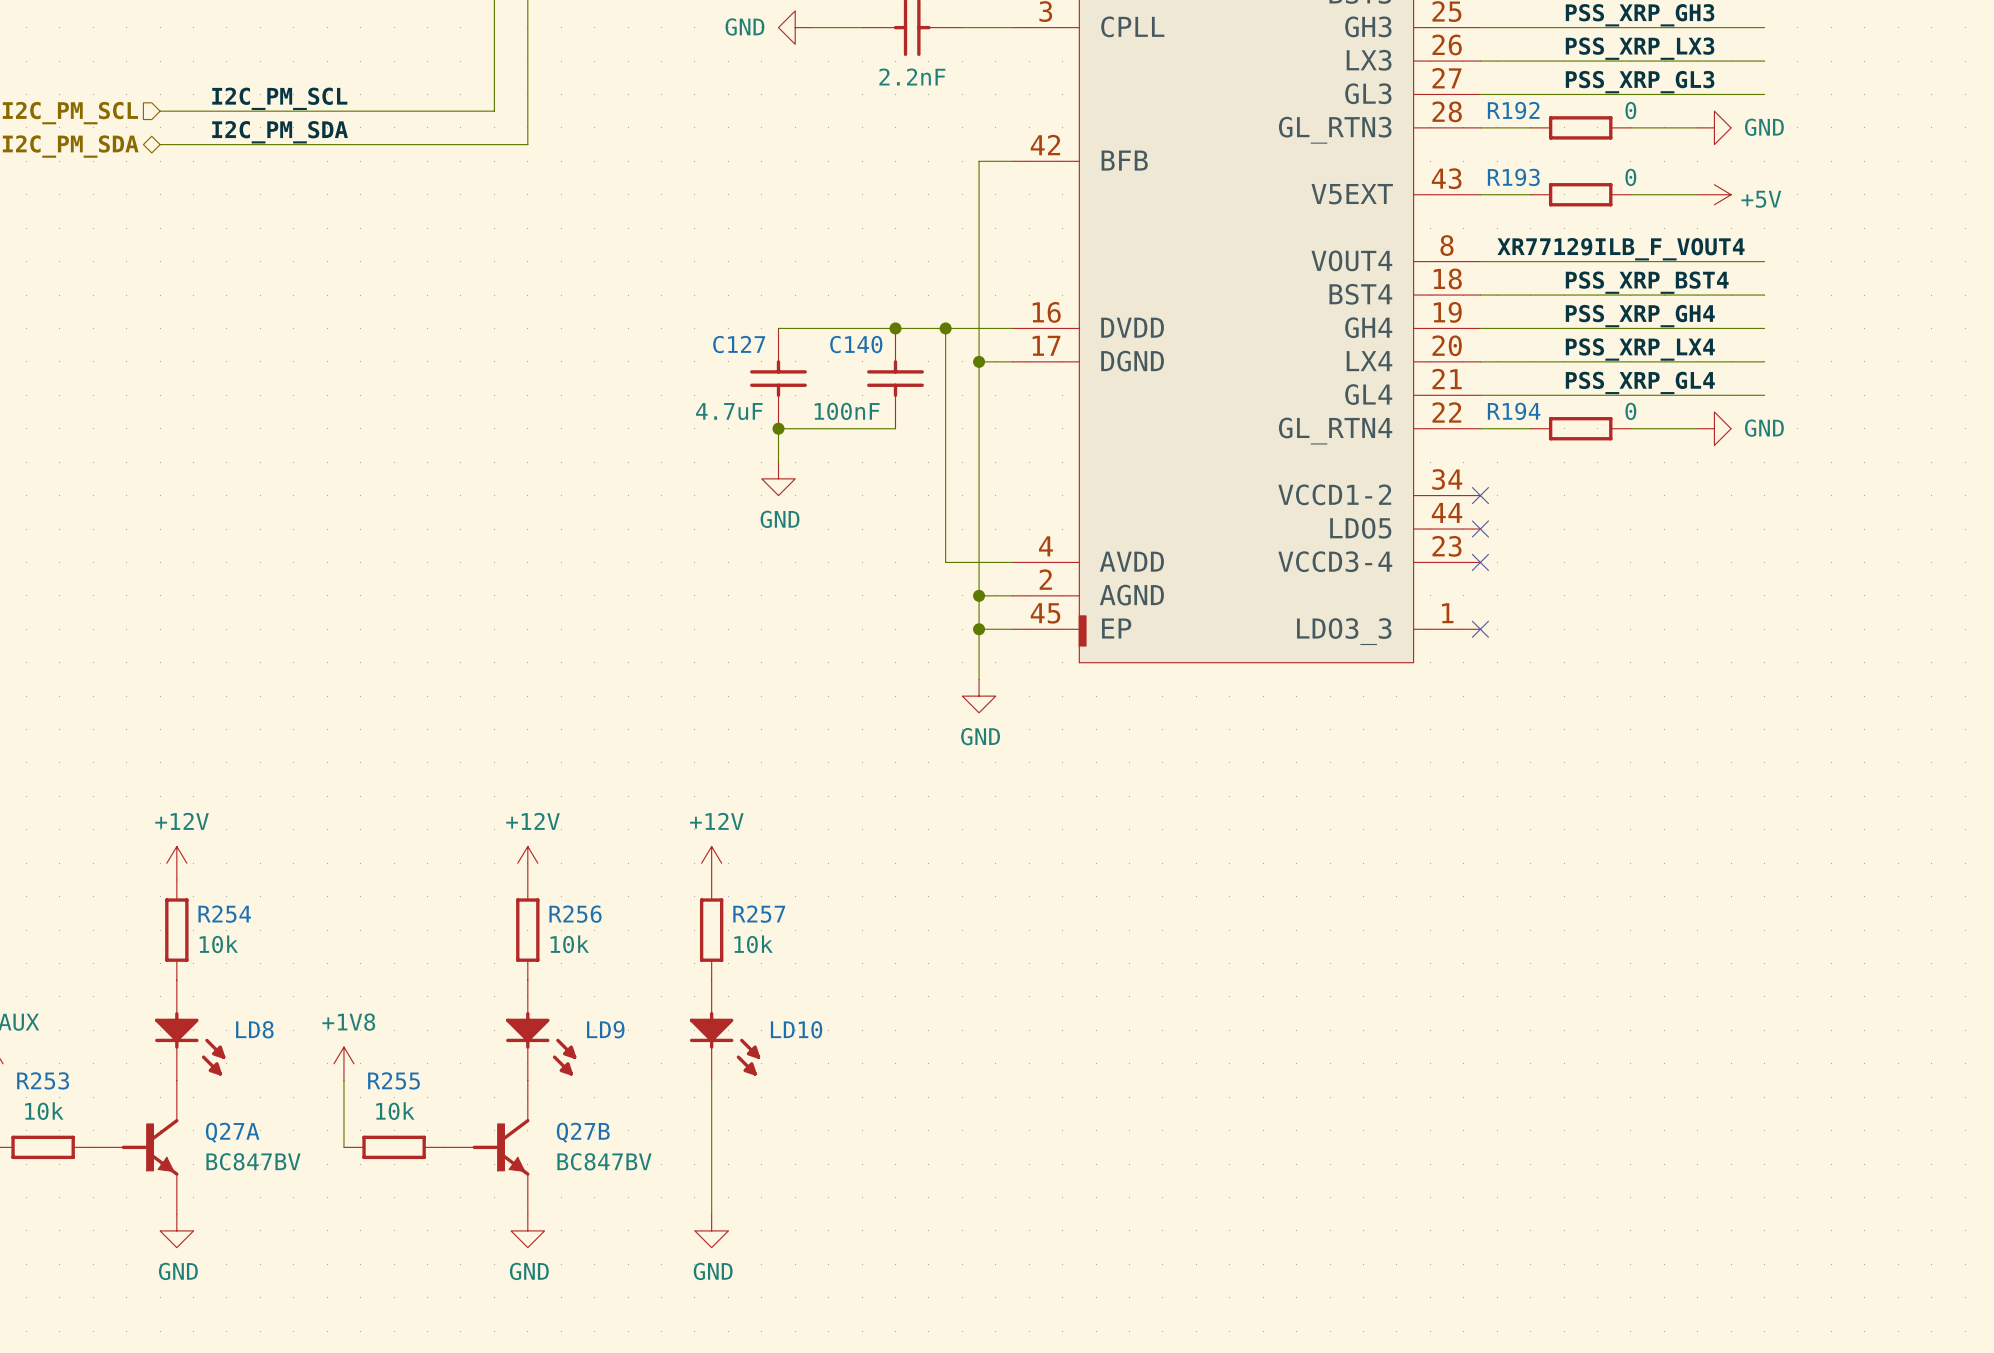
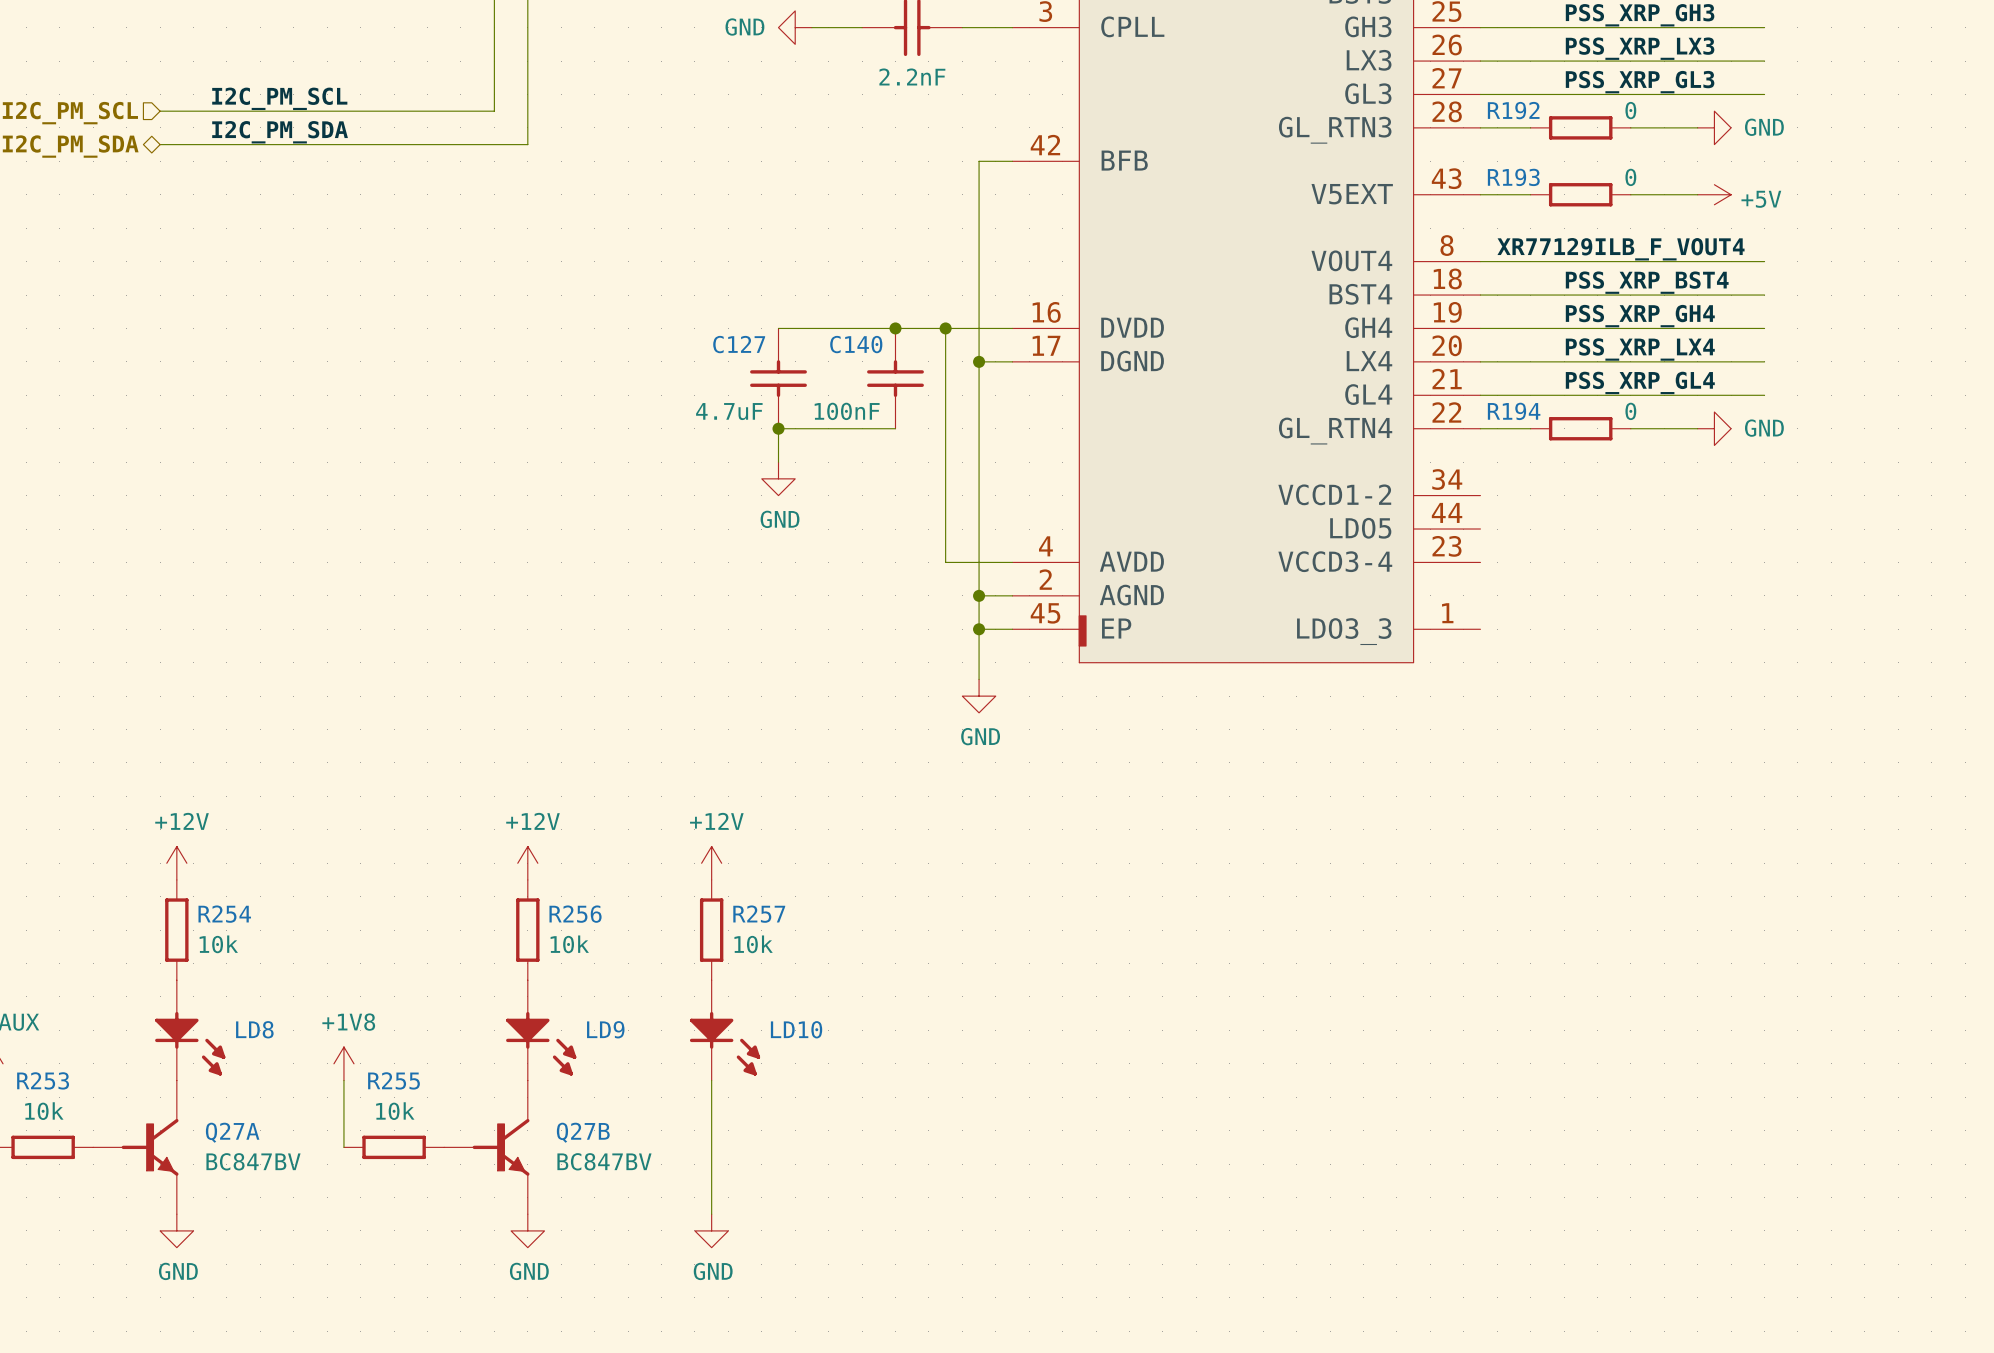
no-connect mark: (1480, 495) -> none
no-connect mark: (1480, 529) -> none
no-connect mark: (1480, 562) -> none
no-connect mark: (1480, 629) -> none

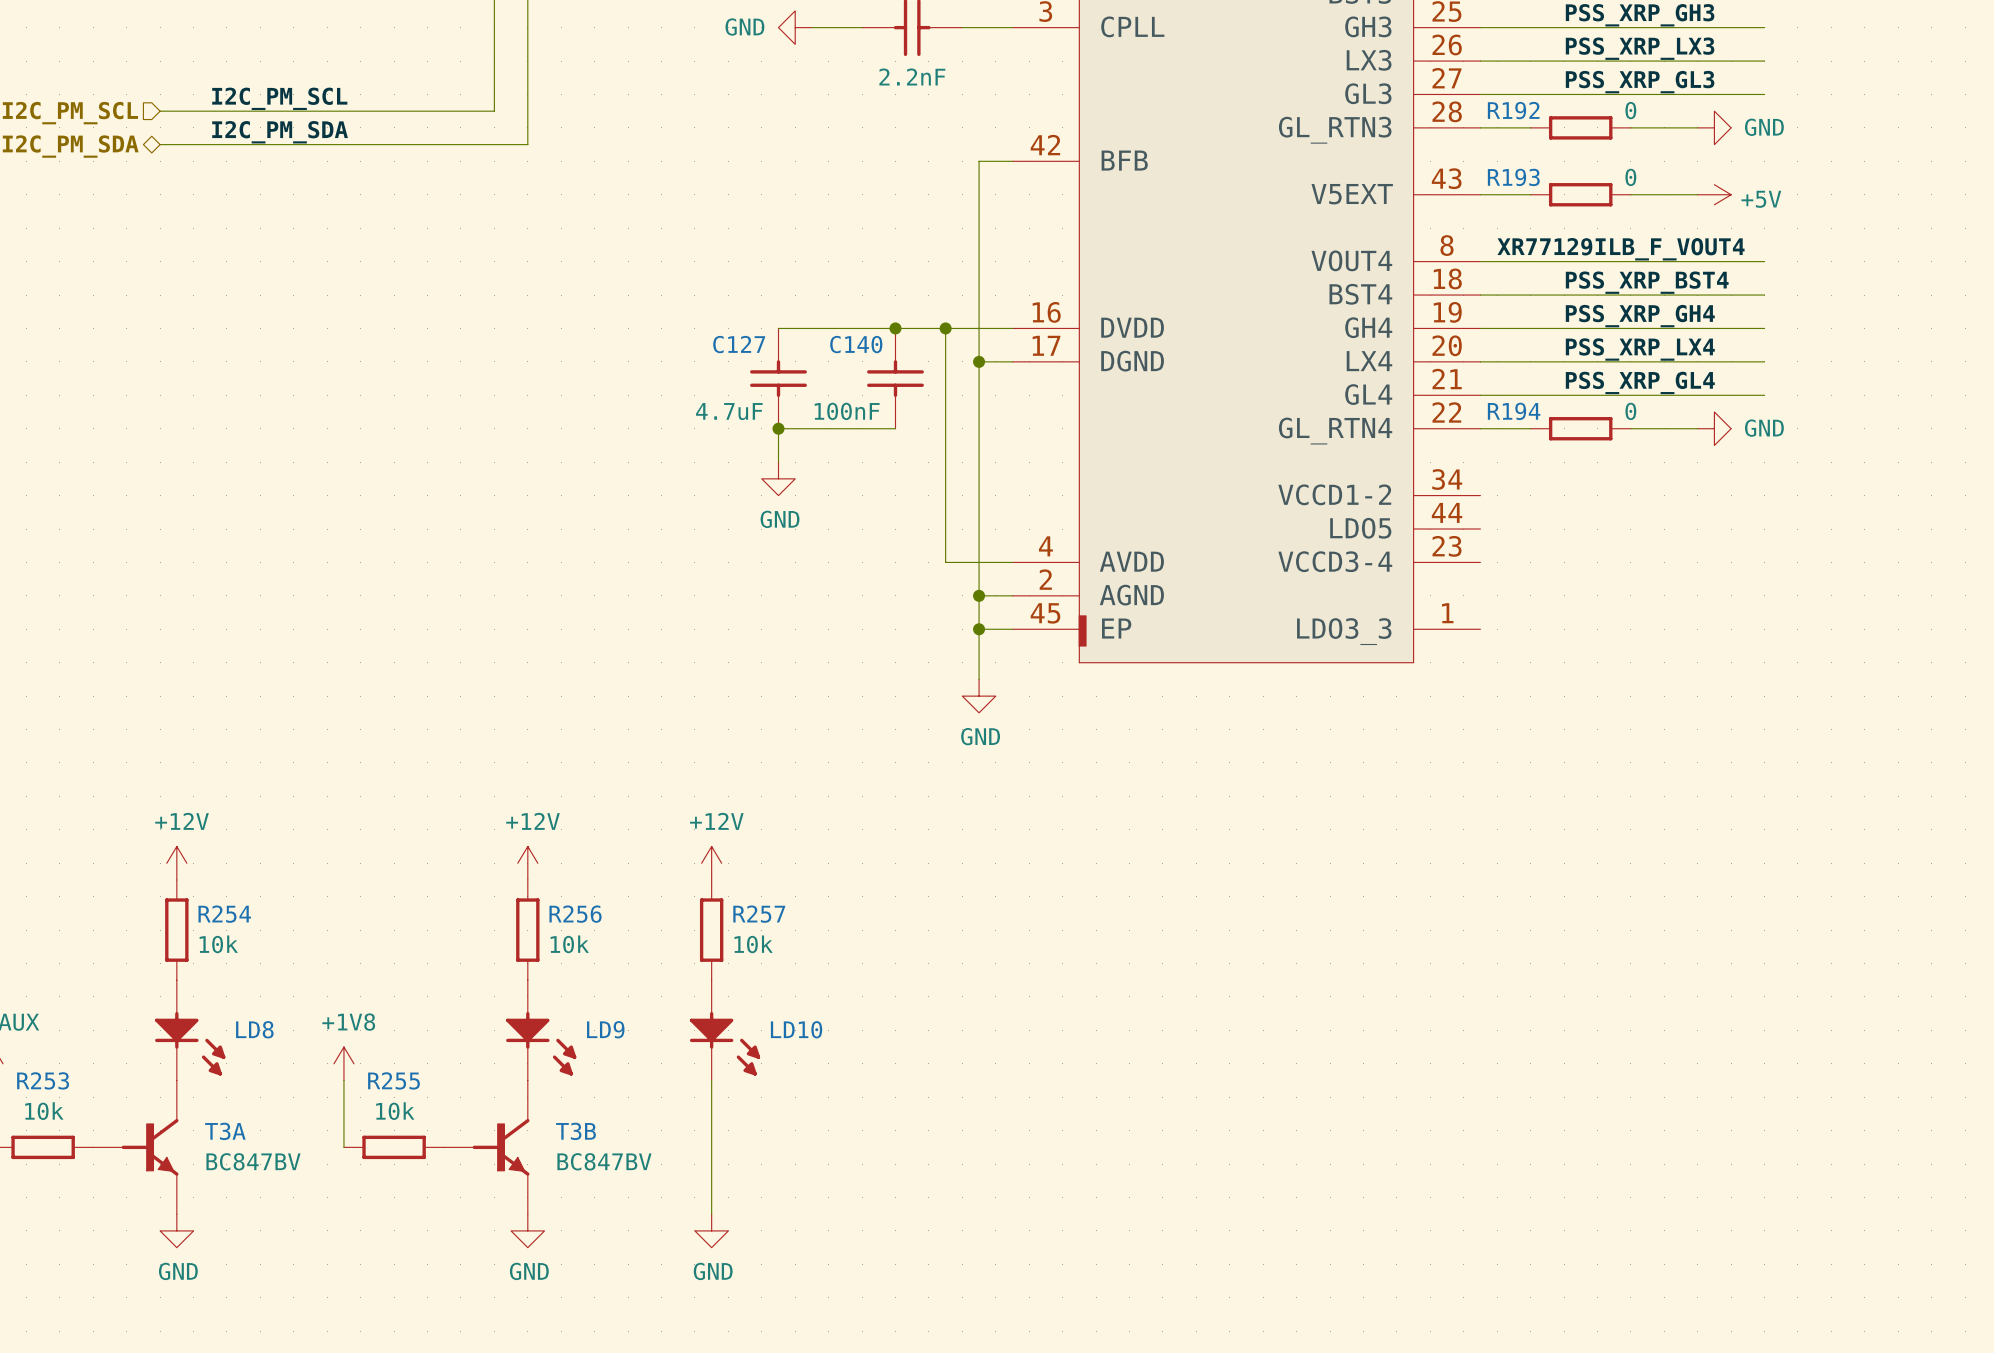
Q27A name: Q27A (232, 1132) -> T3A (225, 1131)
Q27B name: Q27B (583, 1132) -> T3B (575, 1131)

